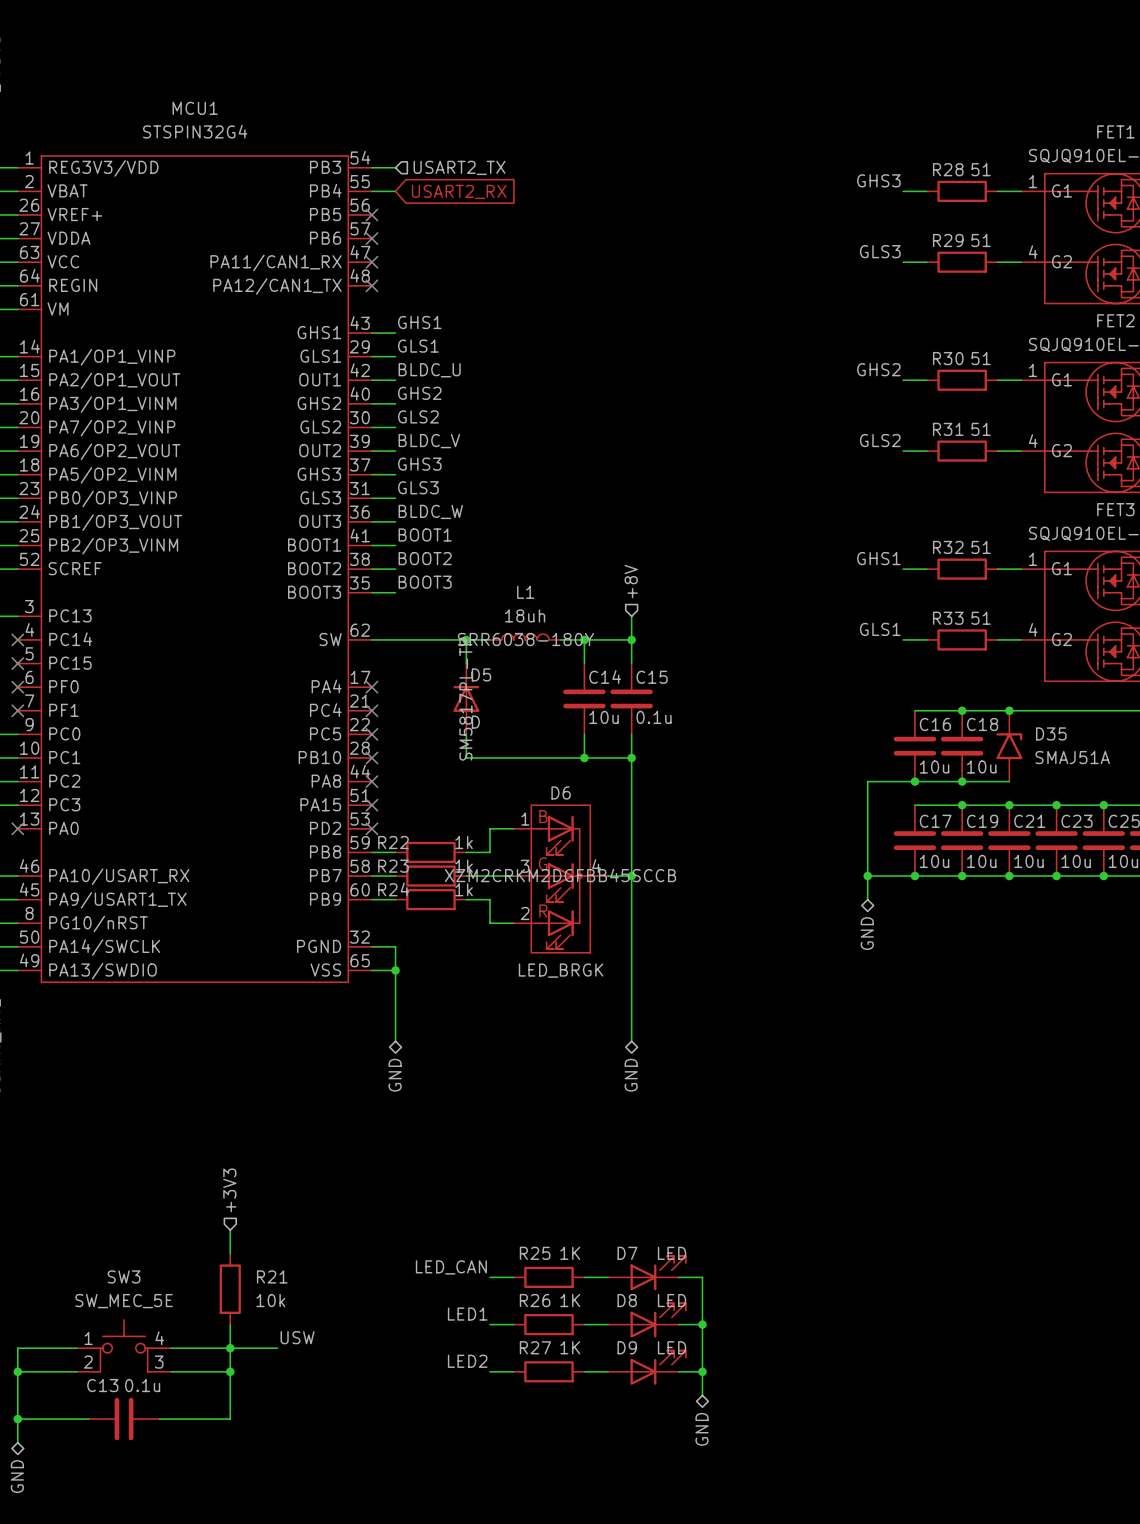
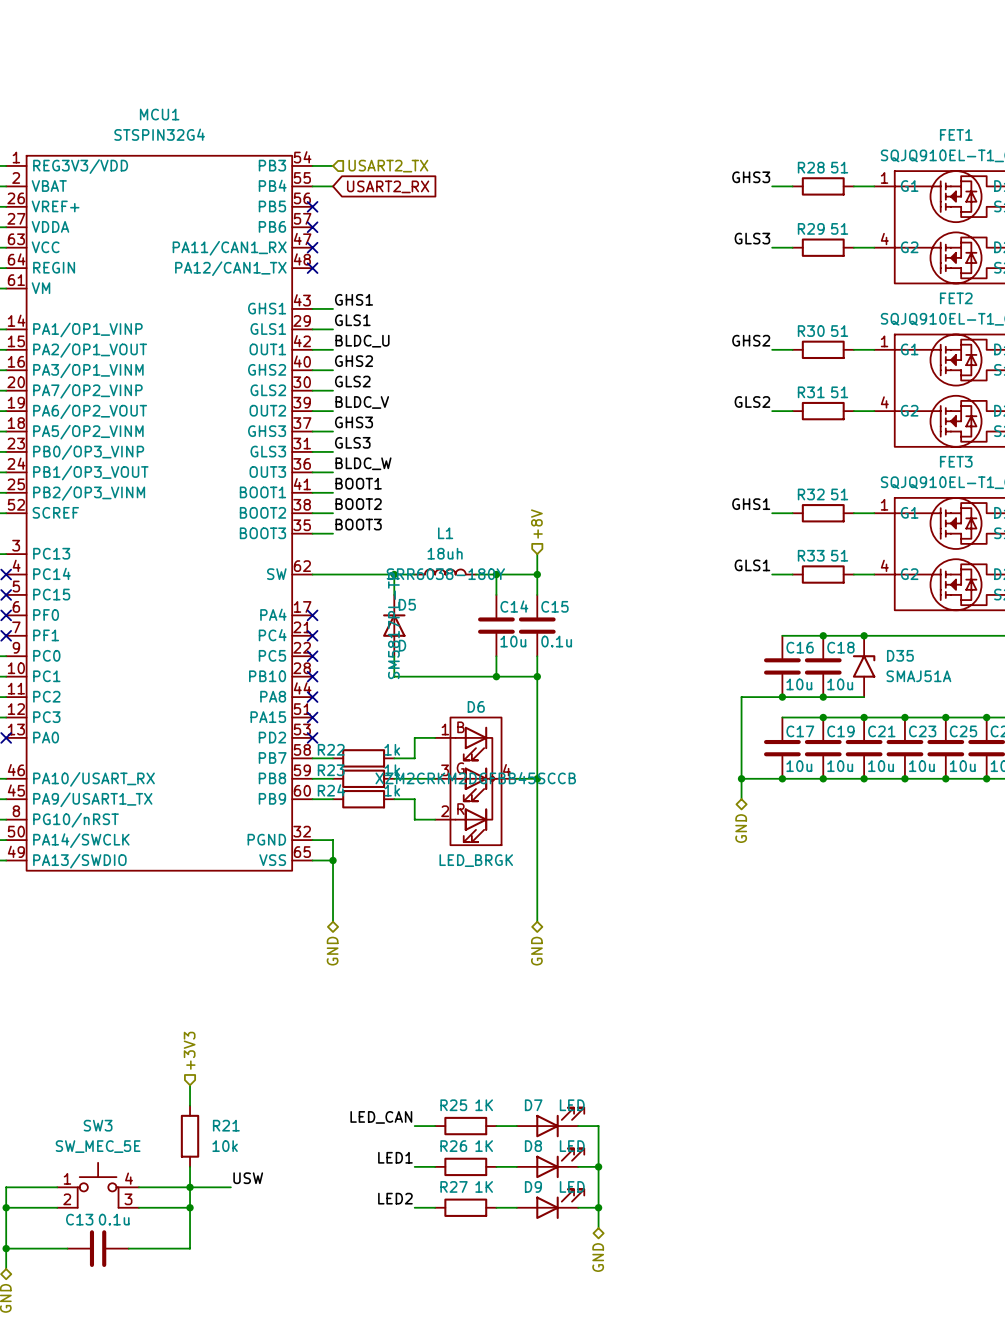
MCU1 pin number: 59 (360, 842) -> 58 (302, 749)
MCU1 pin name: PB8 (325, 851) -> PB7 (272, 757)
MCU1 pin number: 58 (360, 866) -> 59 (302, 770)
MCU1 pin name: PB7 (325, 875) -> PB8 (272, 778)

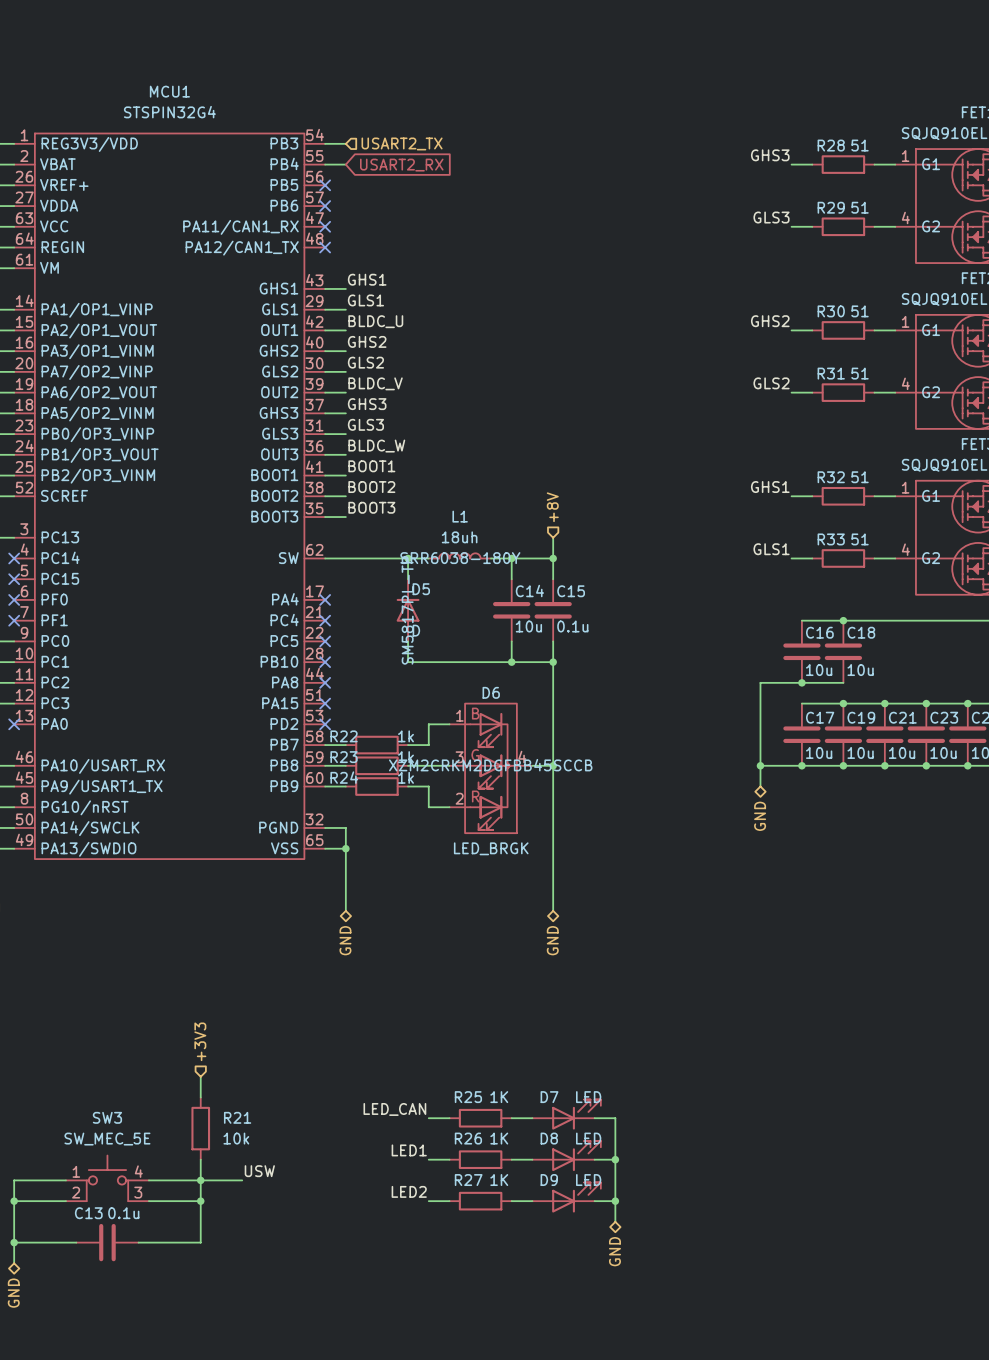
junction: (864, 635) -> none
D35: SMAJ51A (864, 666) -> none
wire: (823, 697) (864, 697) -> none
junction: (823, 697) -> none

